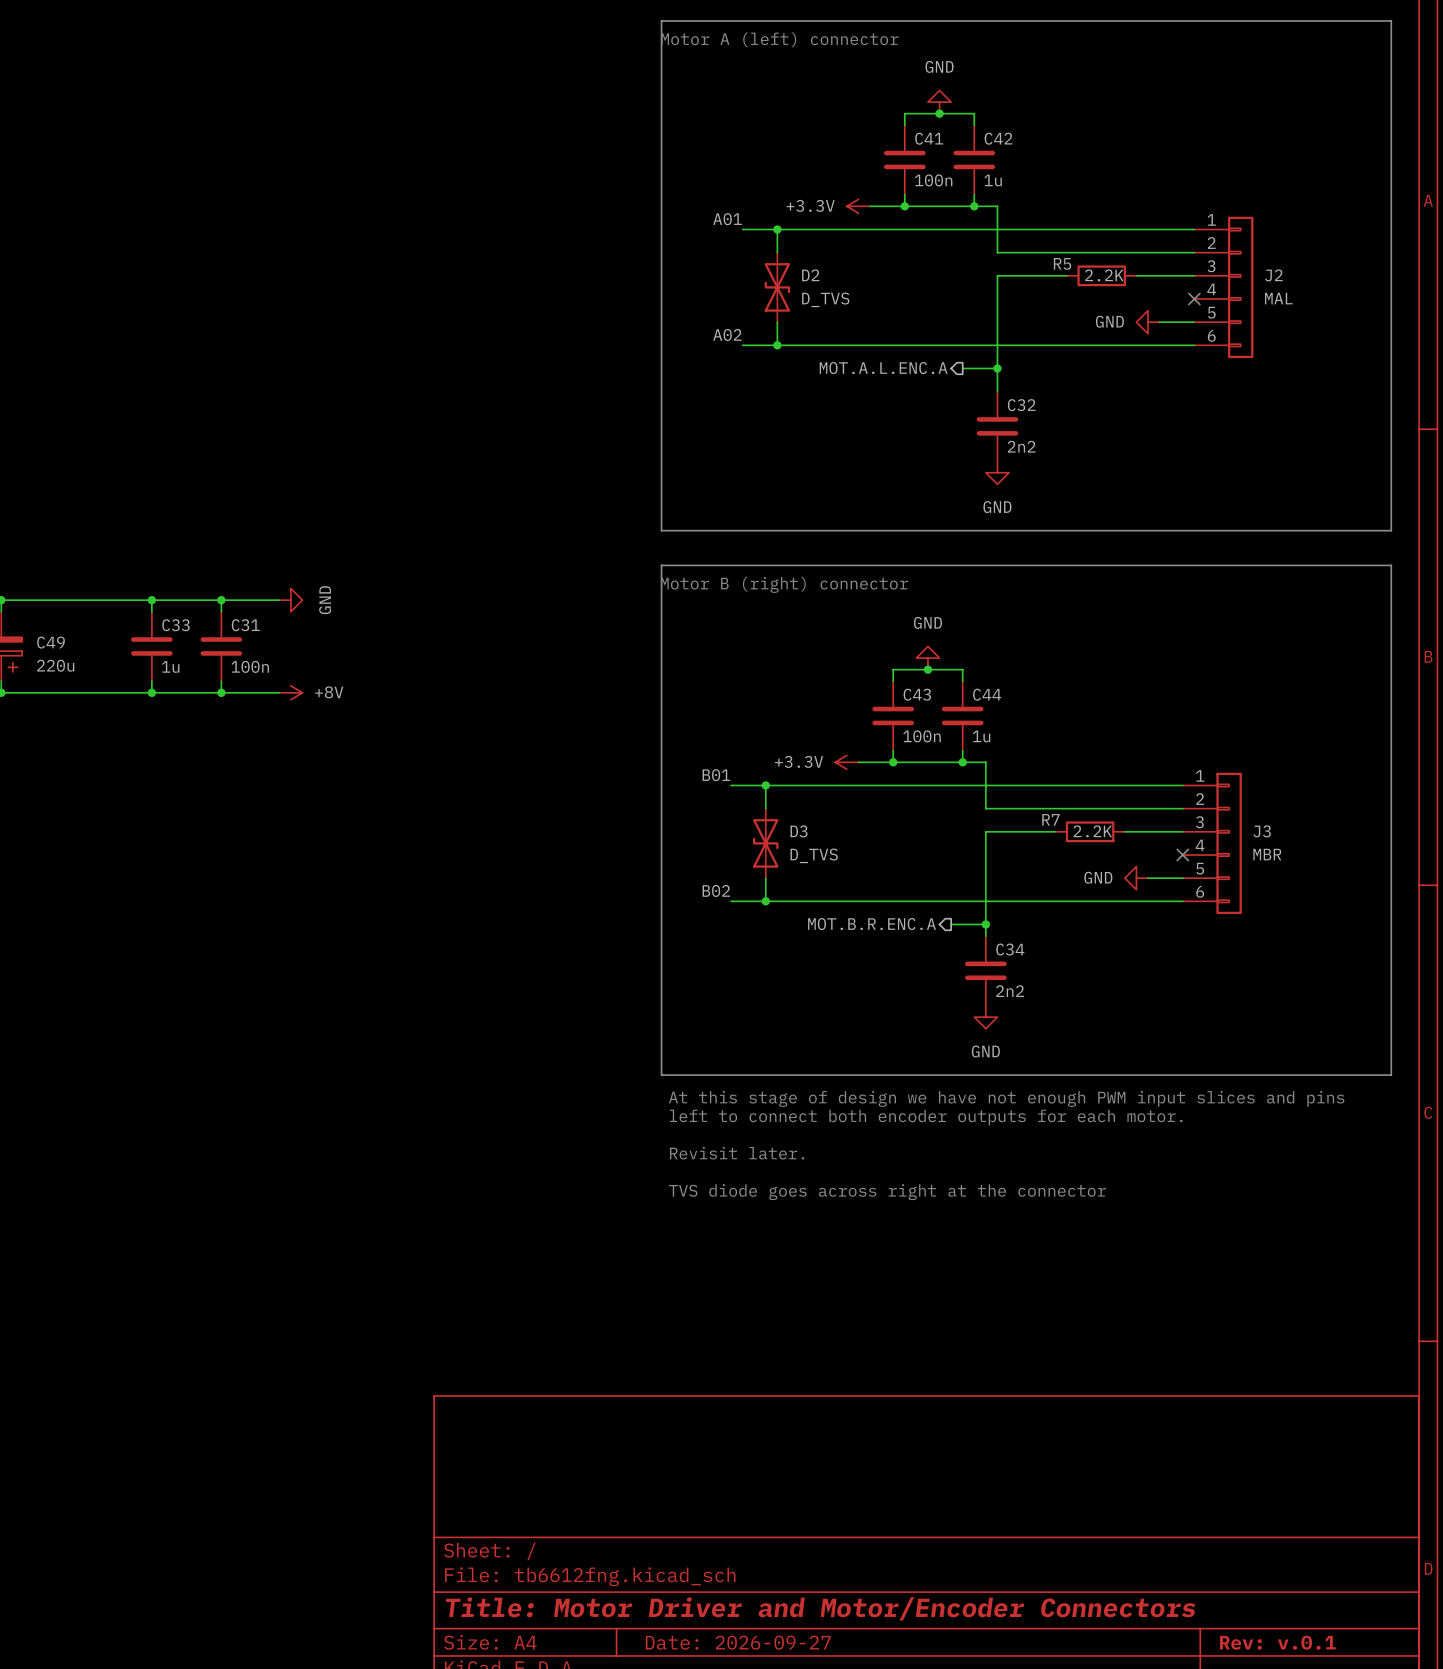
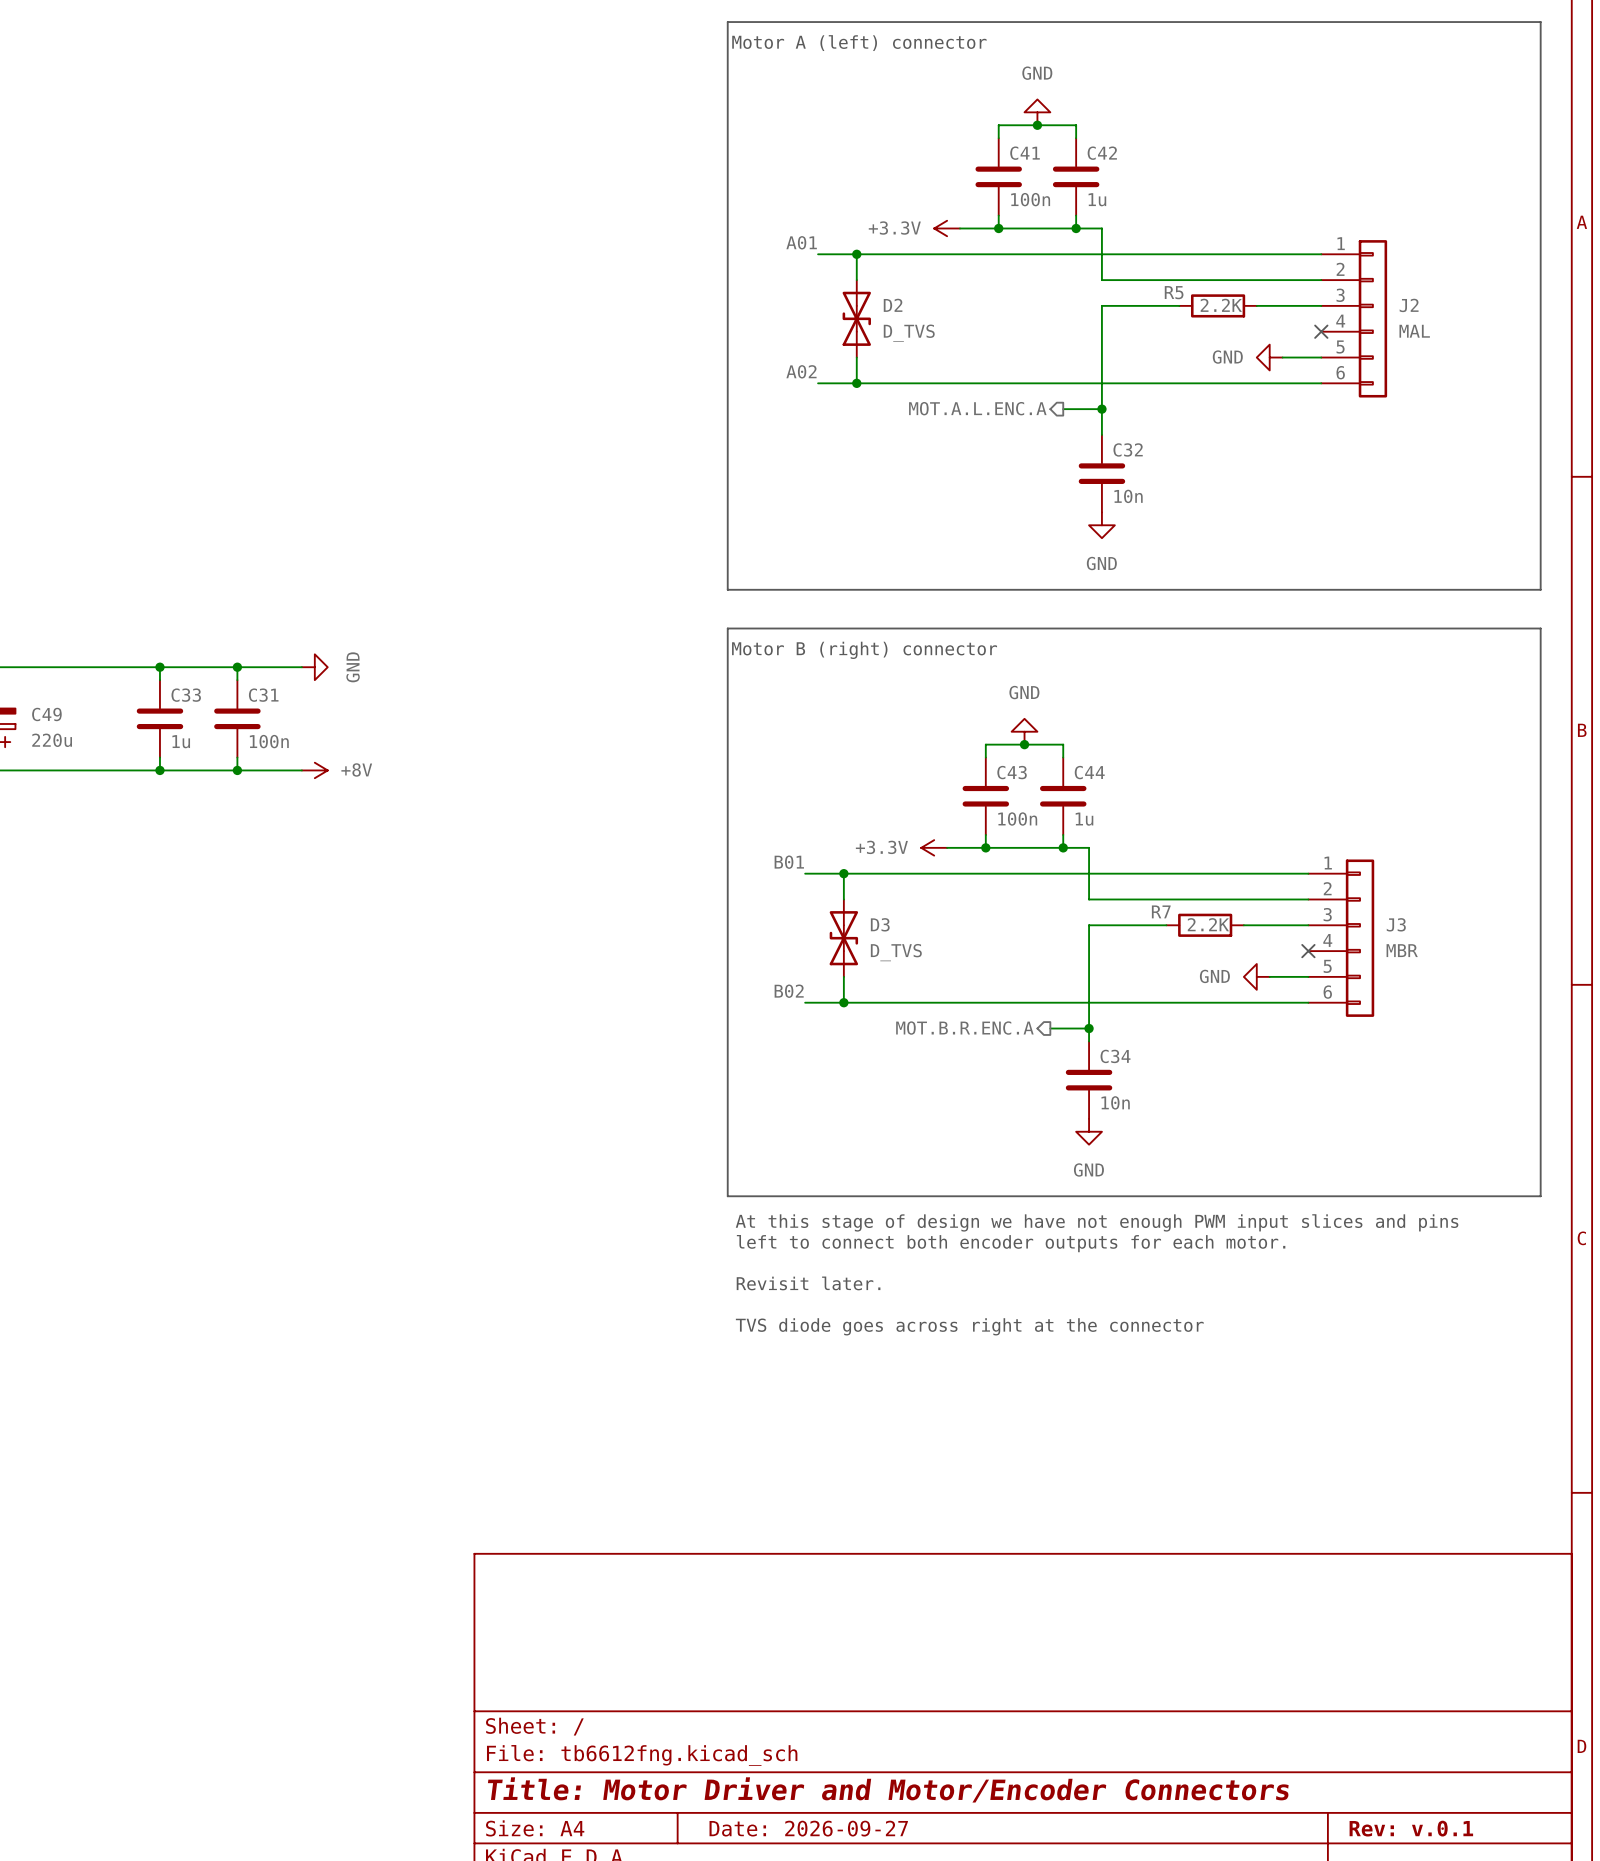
C32 value: 2n2 (1021, 446) -> 10n (1128, 496)
C34 value: 2n2 (1010, 991) -> 10n (1115, 1102)

